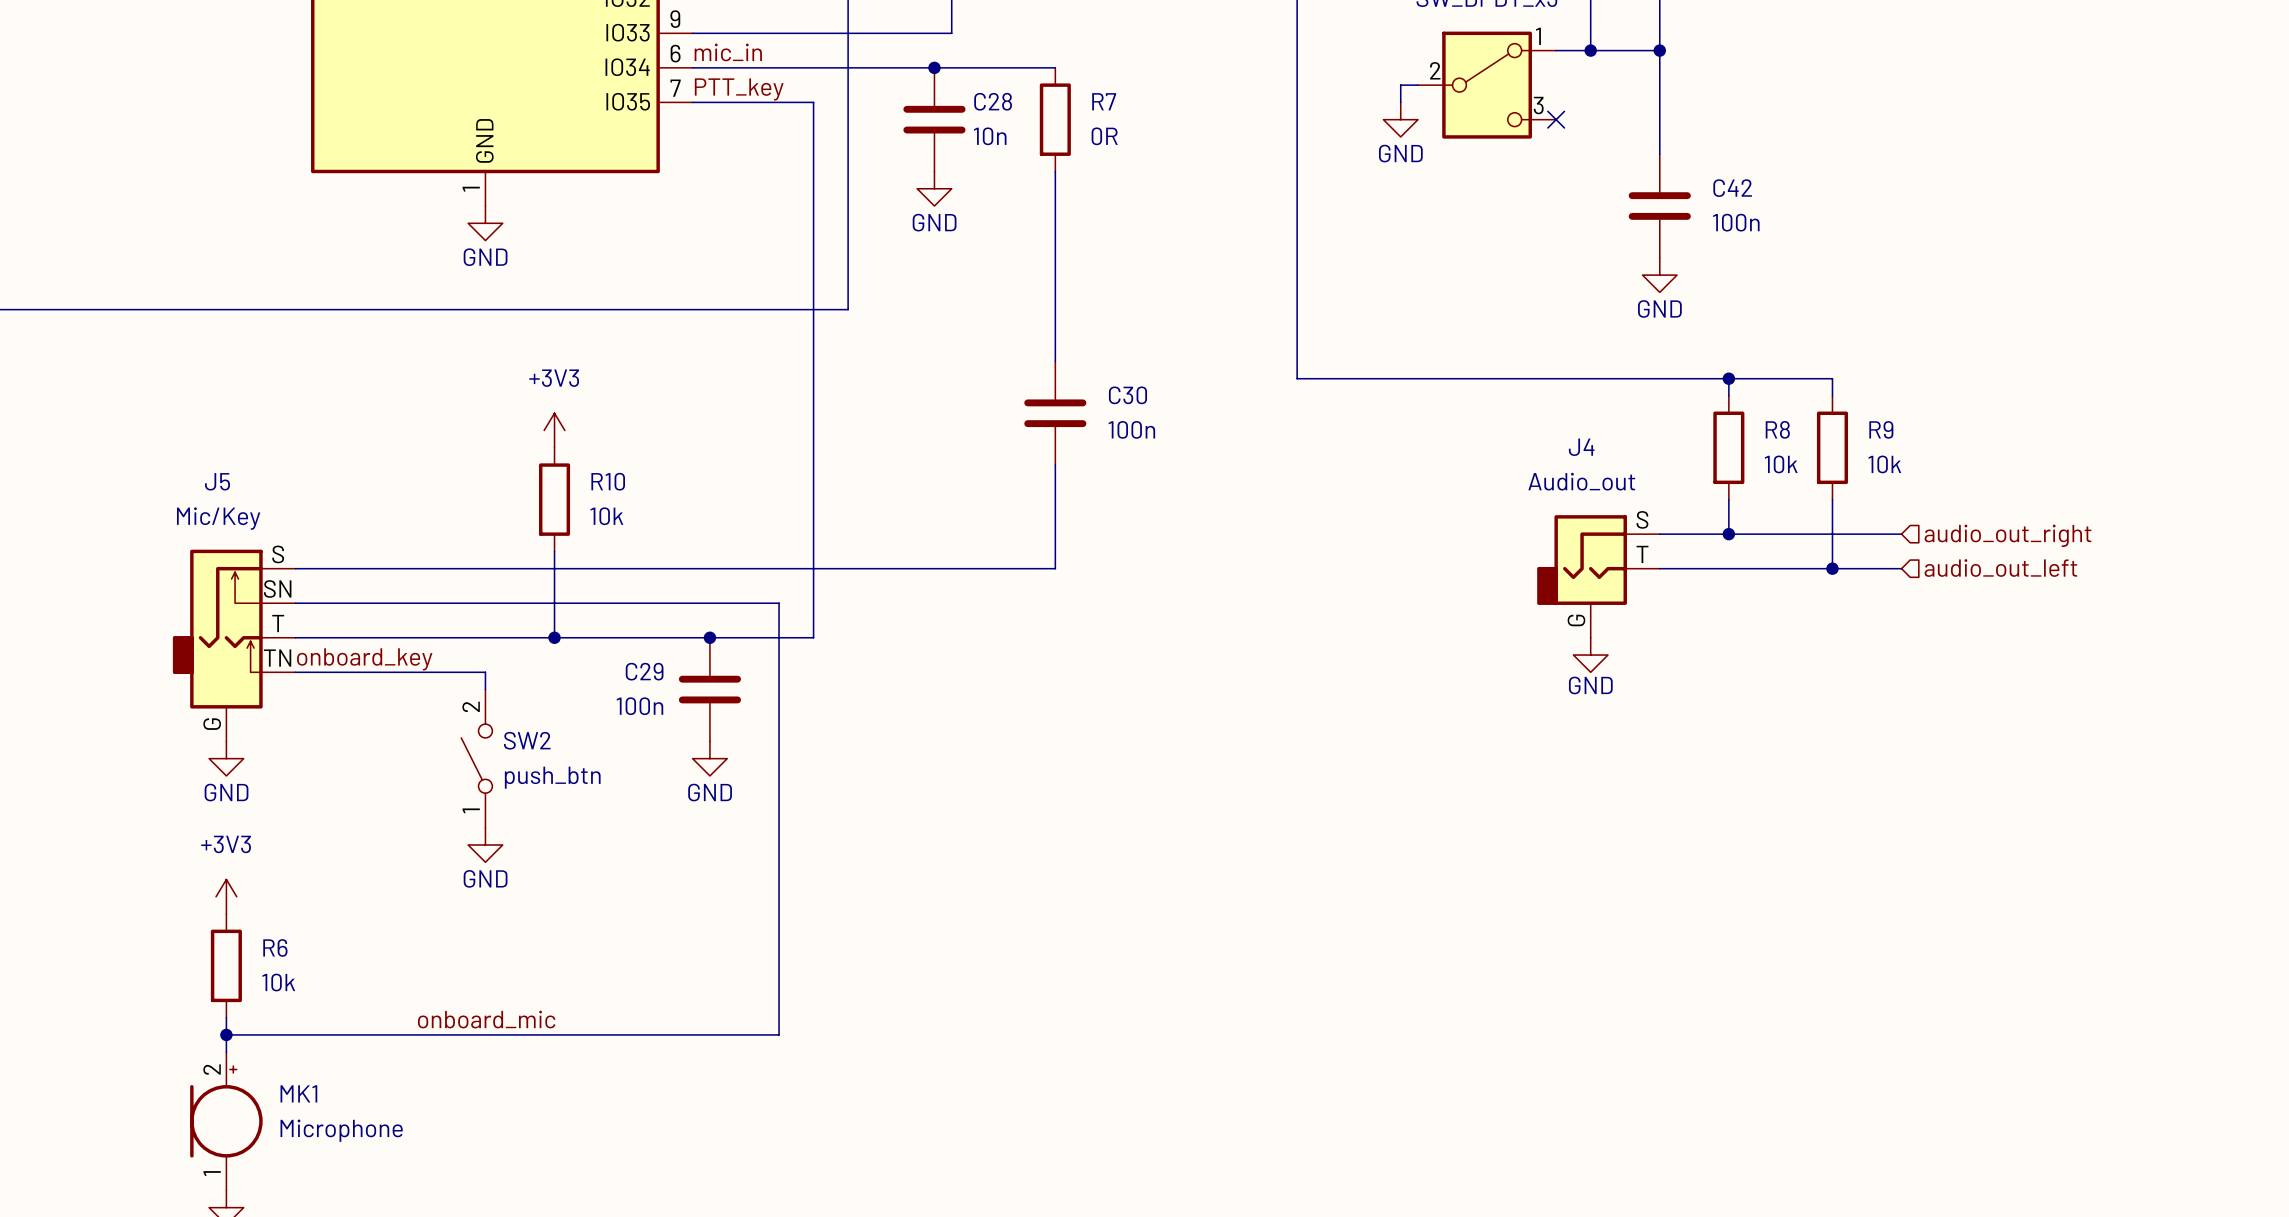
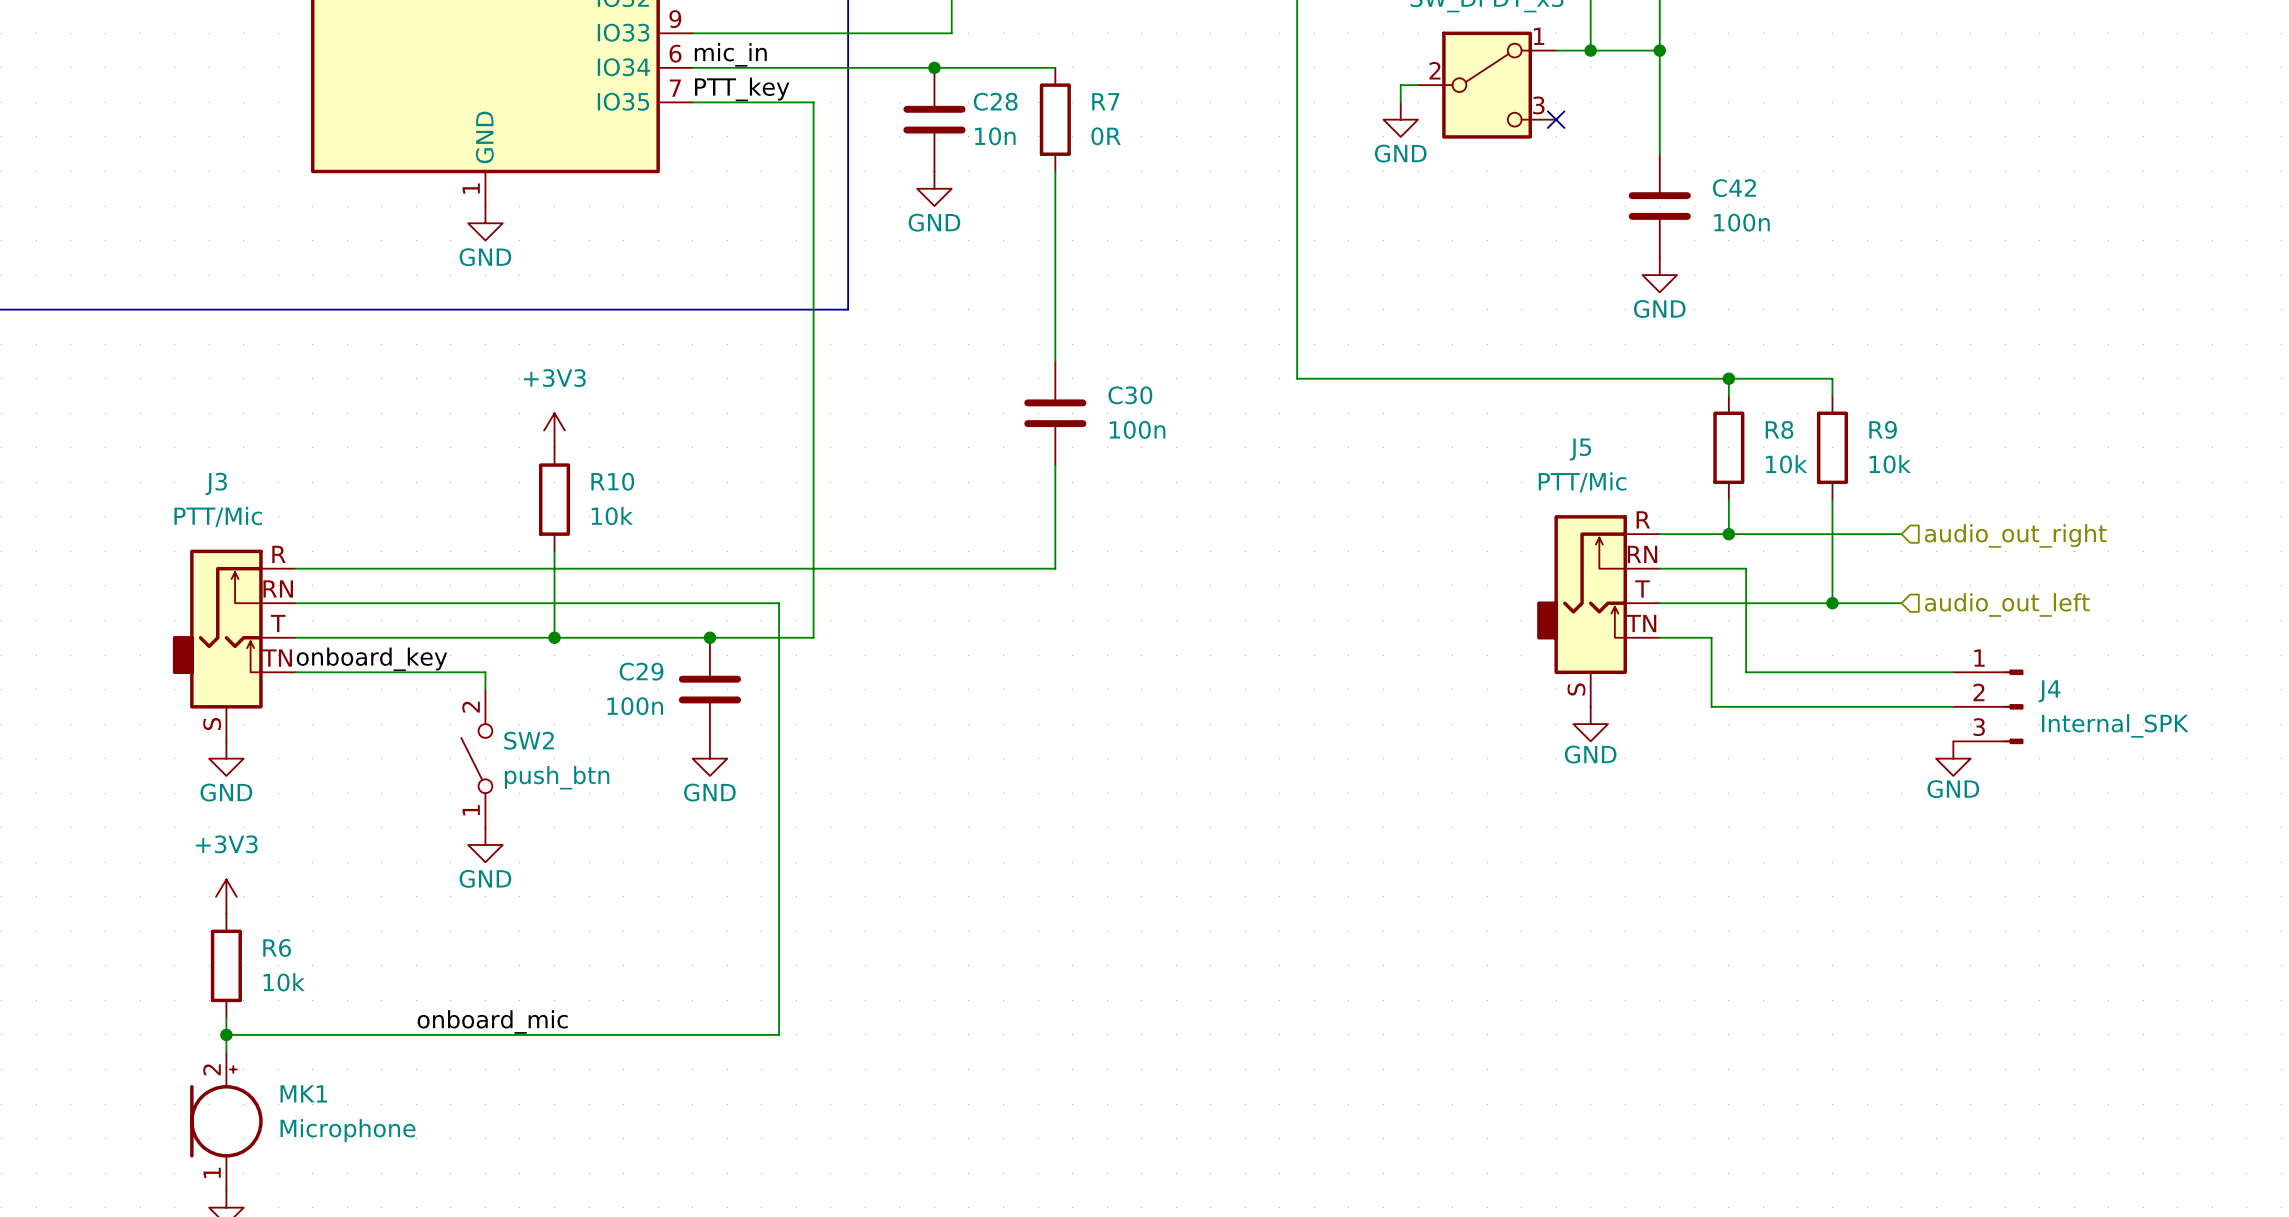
J4 name position: J4 (1581, 447) -> J4 (2049, 691)
J4 value: Audio_out (1581, 481) -> Internal_SPK (2115, 725)
J4 symbol: [1537, 515, 1660, 638] -> [1953, 669, 2024, 745]
J5 value: Mic/Key (218, 518) -> PTT/Mic (1582, 482)
J5 pin number: S (278, 554) -> R (1643, 519)
wire: (1746, 568) (1901, 568) -> (1746, 568) (1746, 672) (1953, 672)
wire: none -> (1832, 568) (1832, 603)
junction position: (1832, 568) -> (1832, 603)
hierarchical label position: audio_out_left (2000, 568) -> audio_out_left (2007, 605)
J5 pin number: SN (277, 588) -> RN (1642, 554)
wire: none -> (1659, 603) (1901, 603)
wire: none -> (1659, 637) (1711, 637) (1711, 706) (1953, 706)
J5 position: (234, 645) -> (1598, 610)
J3: none -> PTT/Mic (234, 645)
power symbol position: GND (1590, 655) -> GND (1590, 724)
J5 pin number: G (212, 724) -> S (1576, 689)
power symbol: none -> GND (1953, 758)

